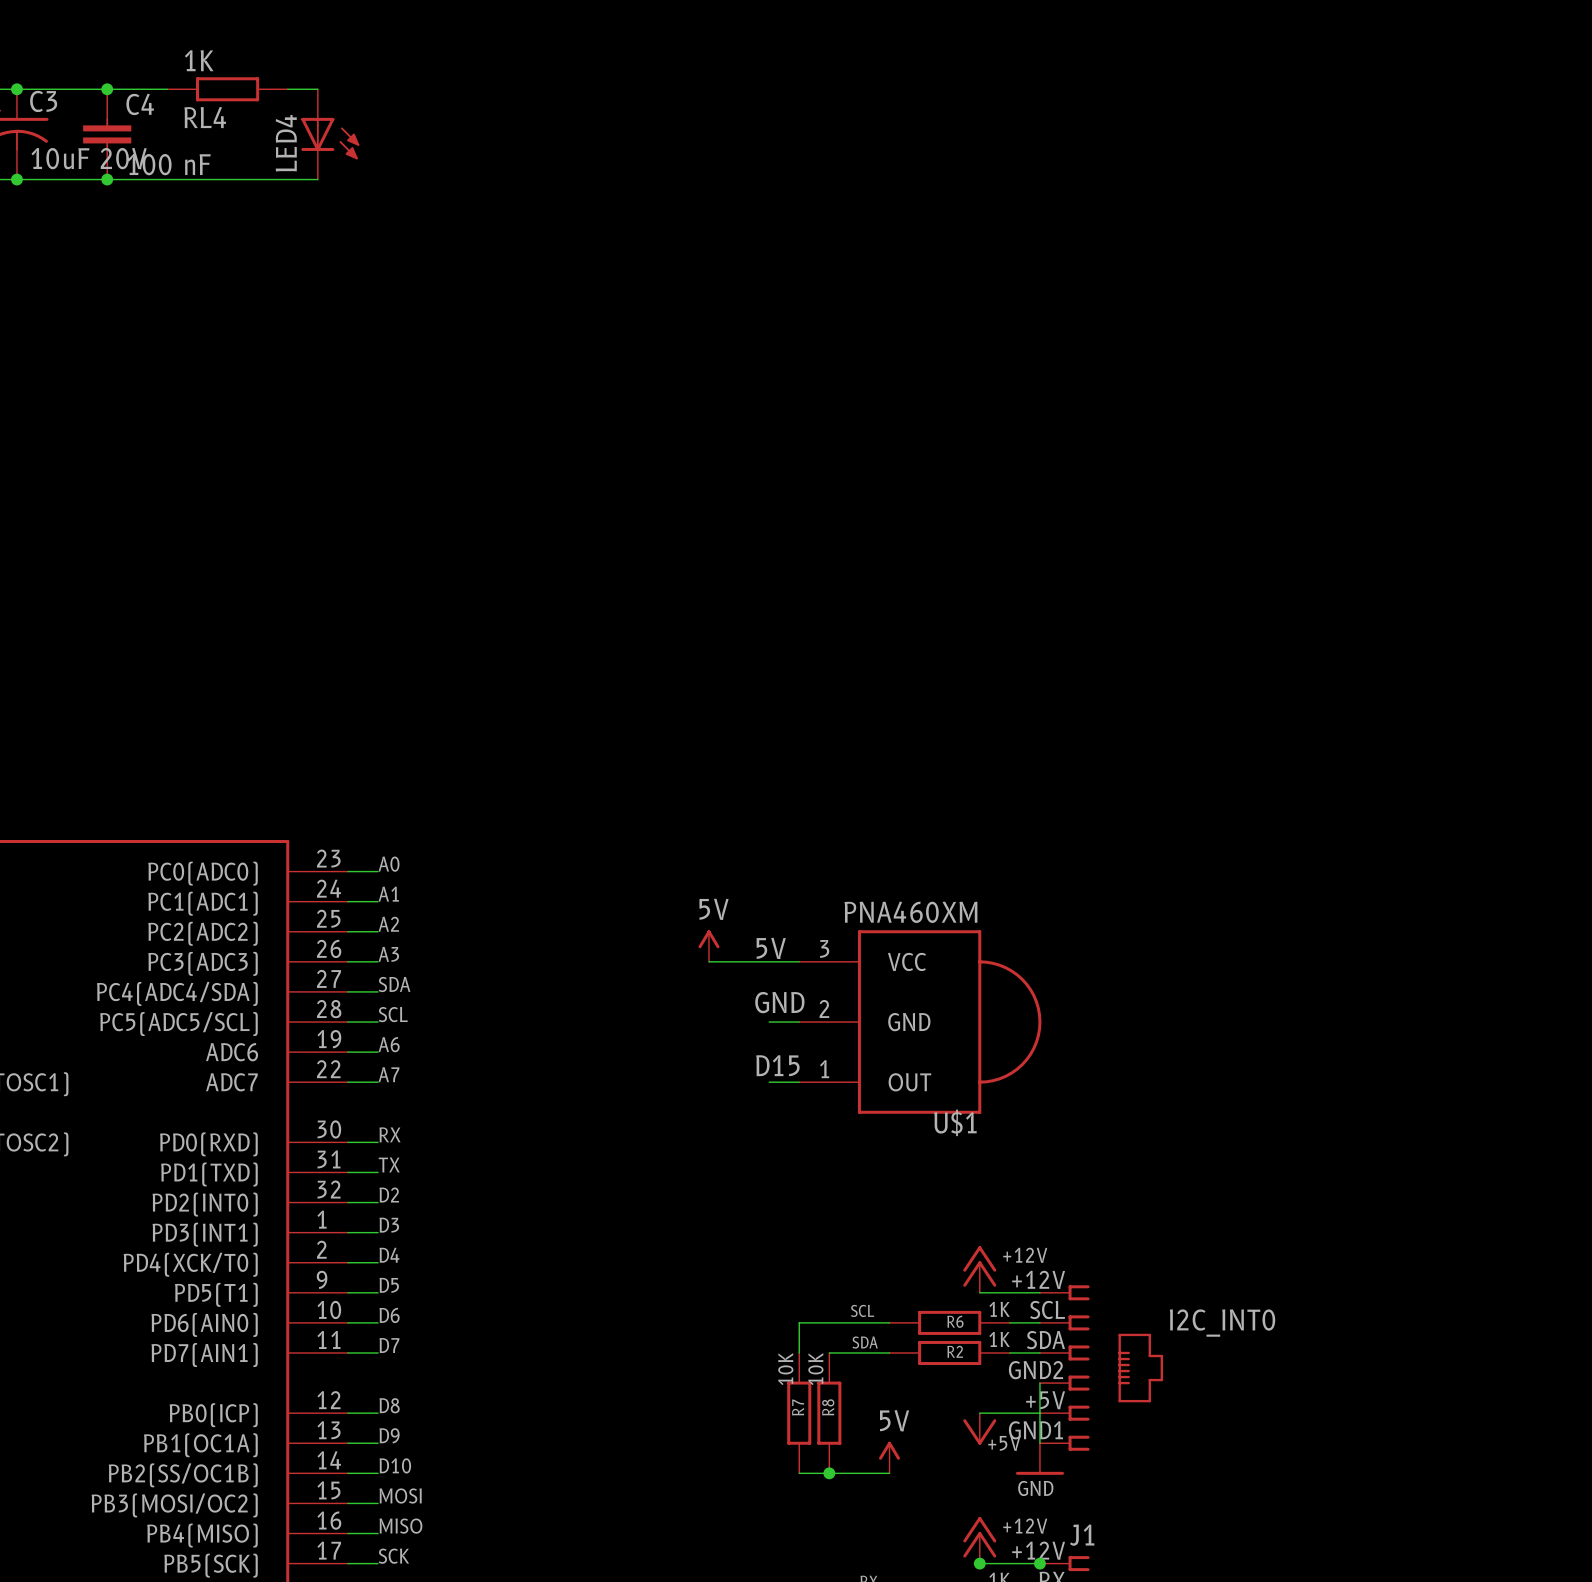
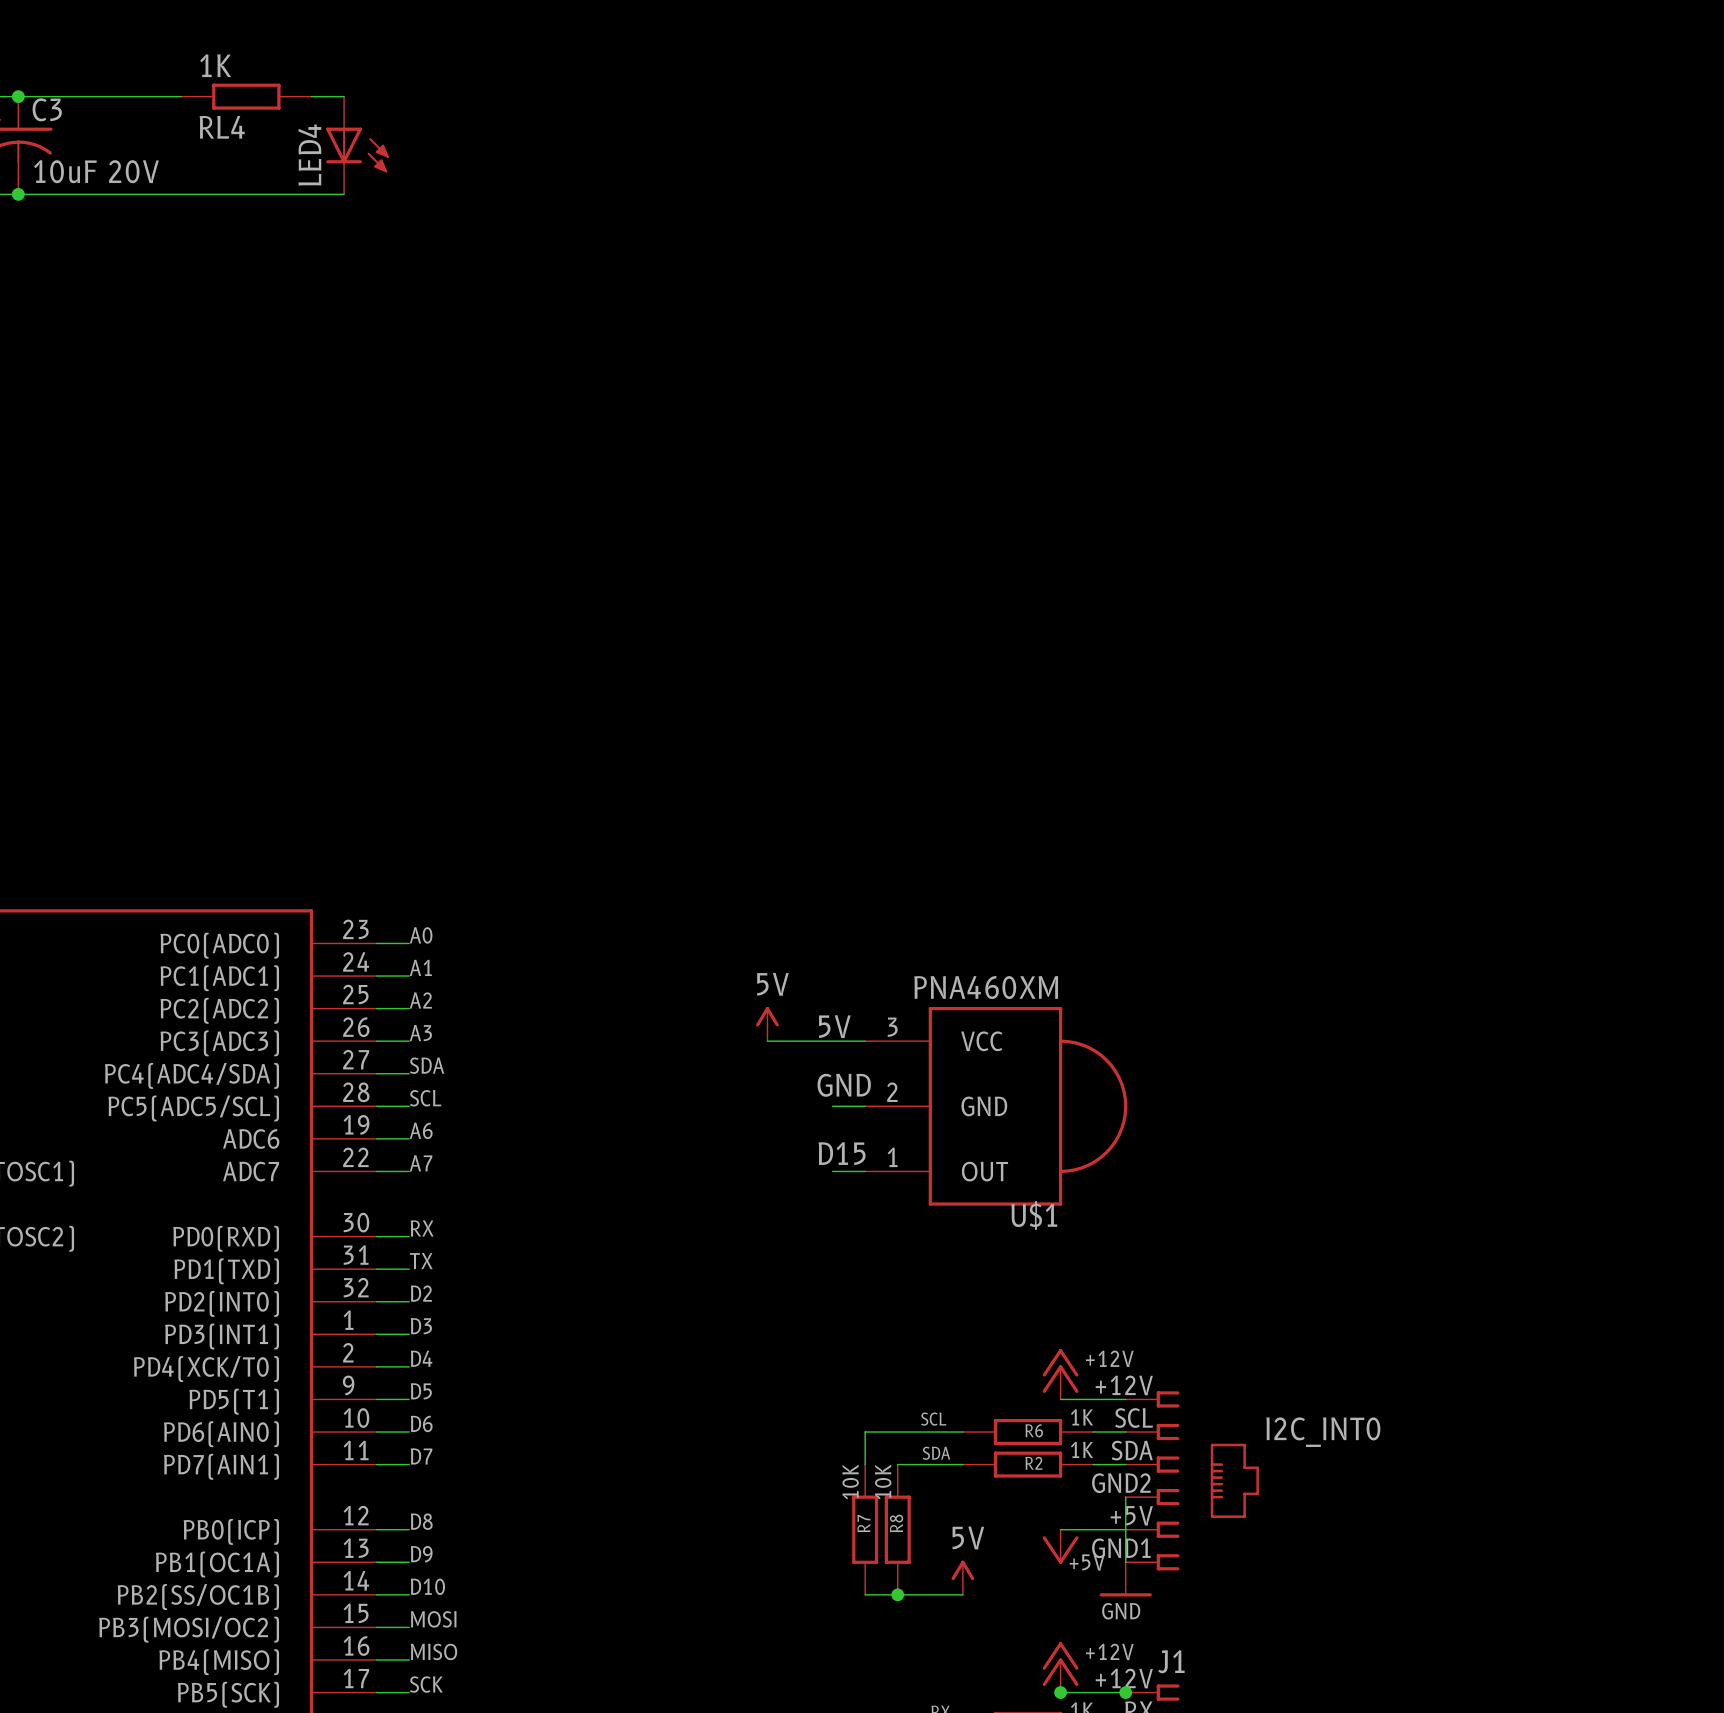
junction: (107, 89) -> none
C4: 100 nF (107, 134) -> none
junction: (107, 179) -> none

